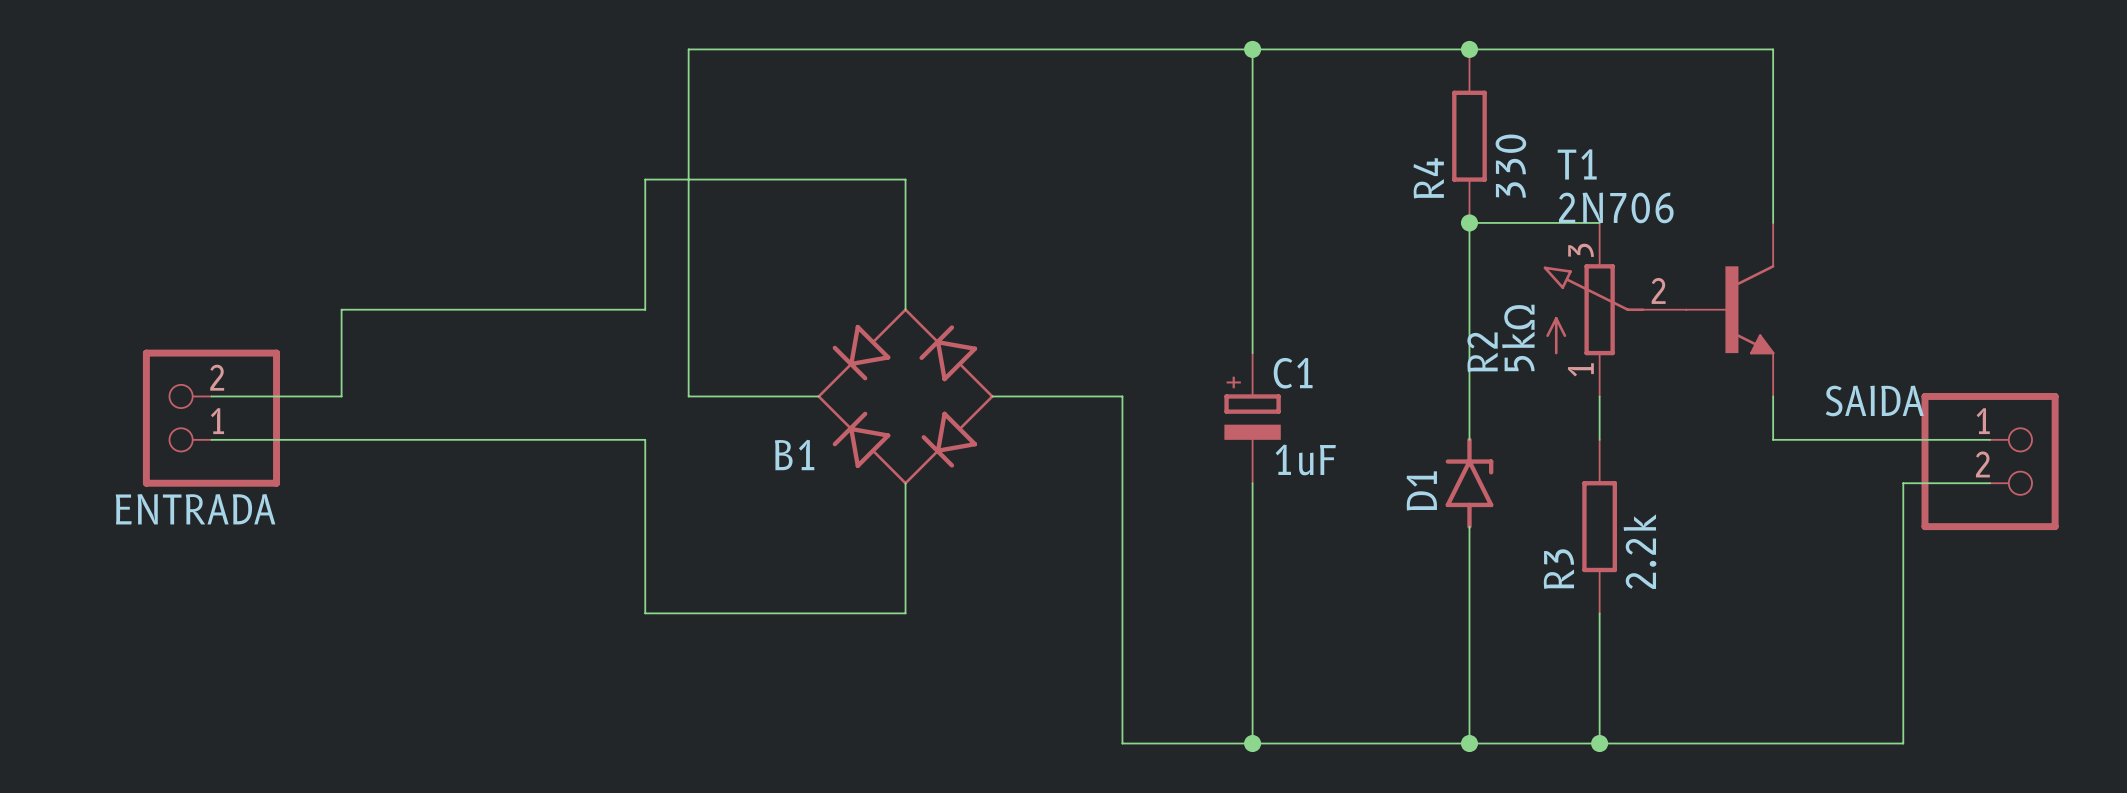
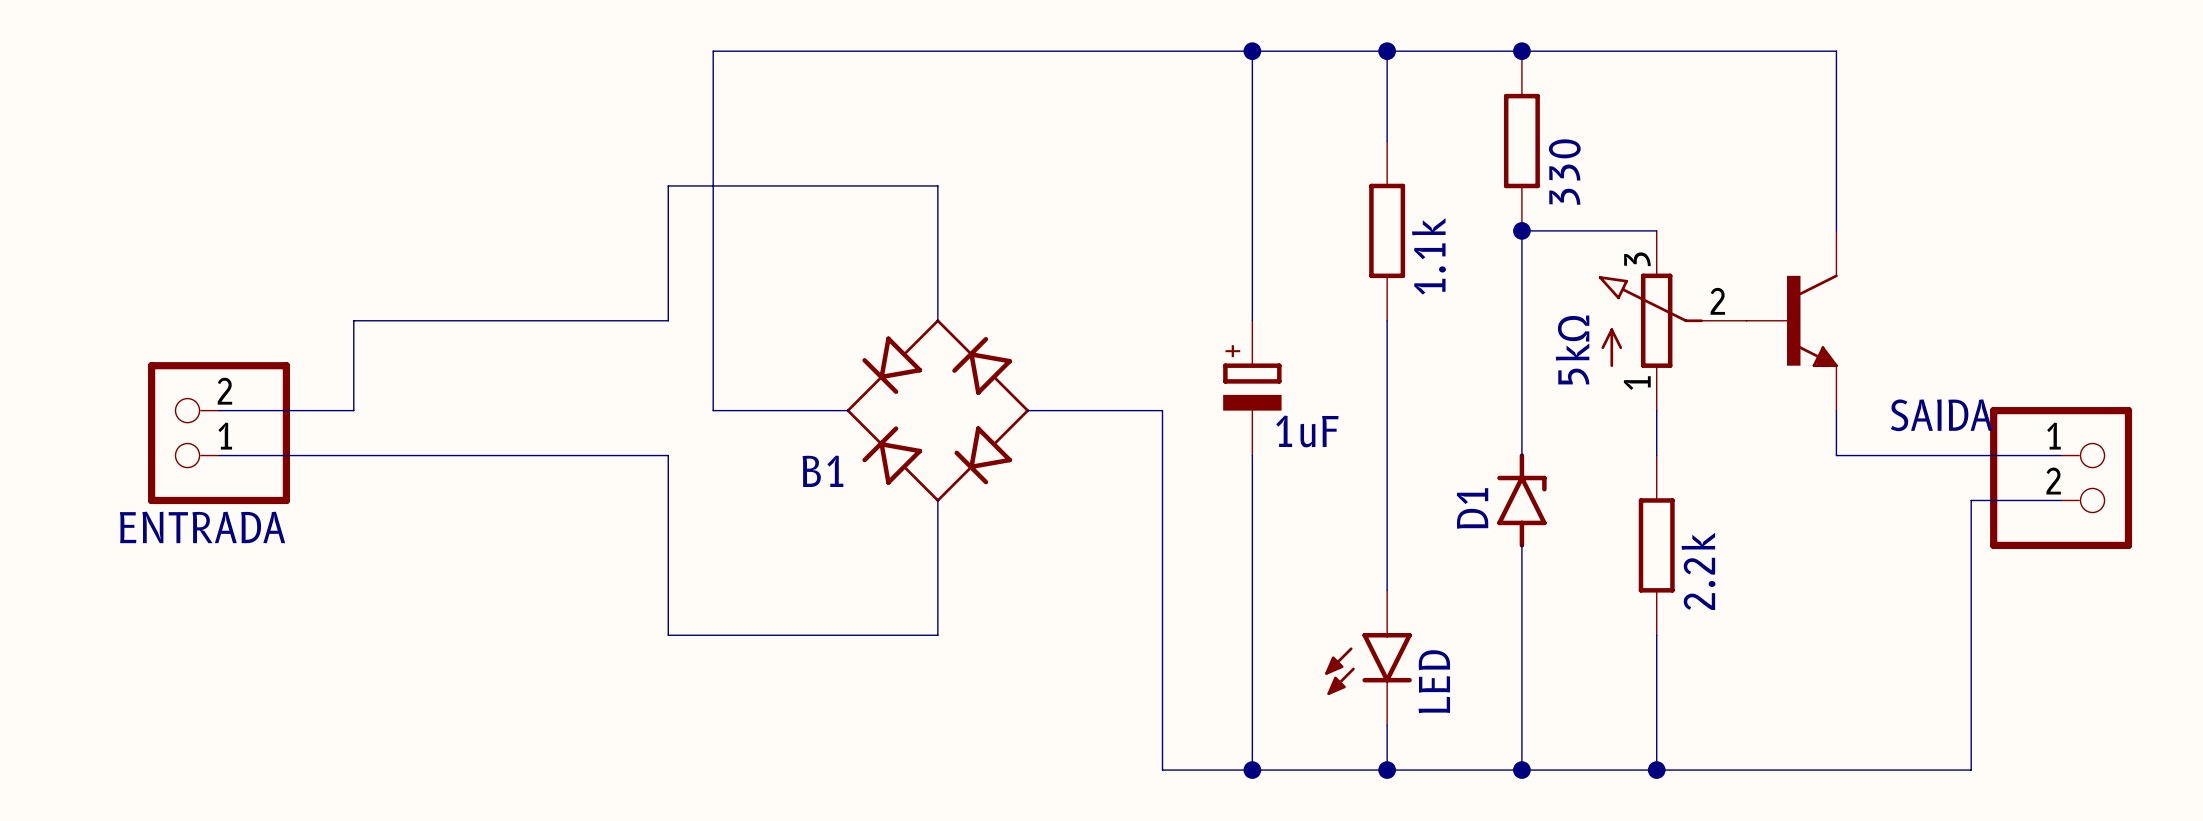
wire: none -> (1252, 51) (1252, 320)
junction: none -> (1252, 51)
wire: (1252, 49) (1252, 353) -> (1252, 455) (1252, 770)
junction: (1252, 49) -> none
wire: none -> (1387, 51) (1387, 141)
junction: none -> (1387, 51)
T1 name: T1 (1577, 164) -> none
R4 name: R4 (1428, 178) -> none
T1 value: 2N706 (1616, 207) -> none
part: none -> 1.1k (1387, 230)
R2 name: R2 (1482, 352) -> none
part: none -> 1uF (1252, 388)
C1: 1uF (1252, 418) -> none
wire: (1252, 483) (1252, 743) -> (1387, 320) (1387, 590)
R3 name: R3 (1558, 569) -> none
LED: none -> (1368, 657)
wire: none -> (1387, 725) (1387, 770)
junction: none -> (1252, 770)
junction: (1252, 743) -> none
junction: none -> (1387, 770)

